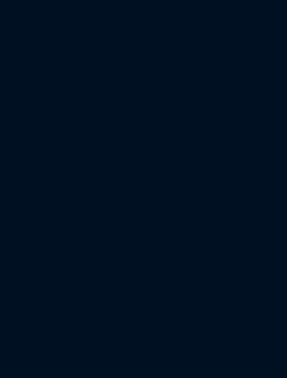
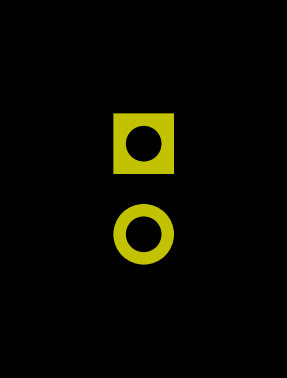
part: none -> (143, 188)

